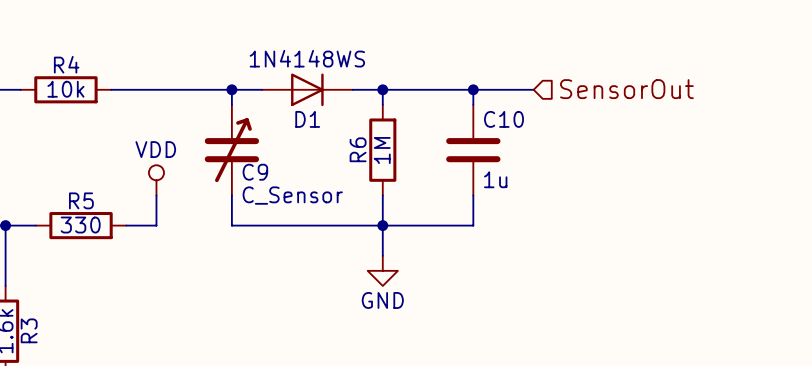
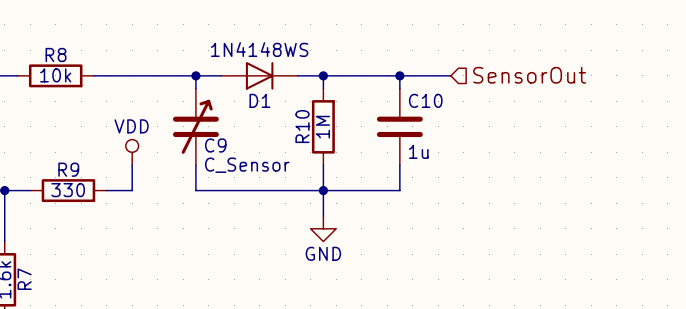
R4 name: R4 (66, 64) -> R8 (56, 54)
R6 name: R6 (358, 149) -> R10 (302, 126)
R5 name: R5 (81, 200) -> R9 (68, 169)
R3 name: R3 (29, 330) -> R7 (24, 279)

